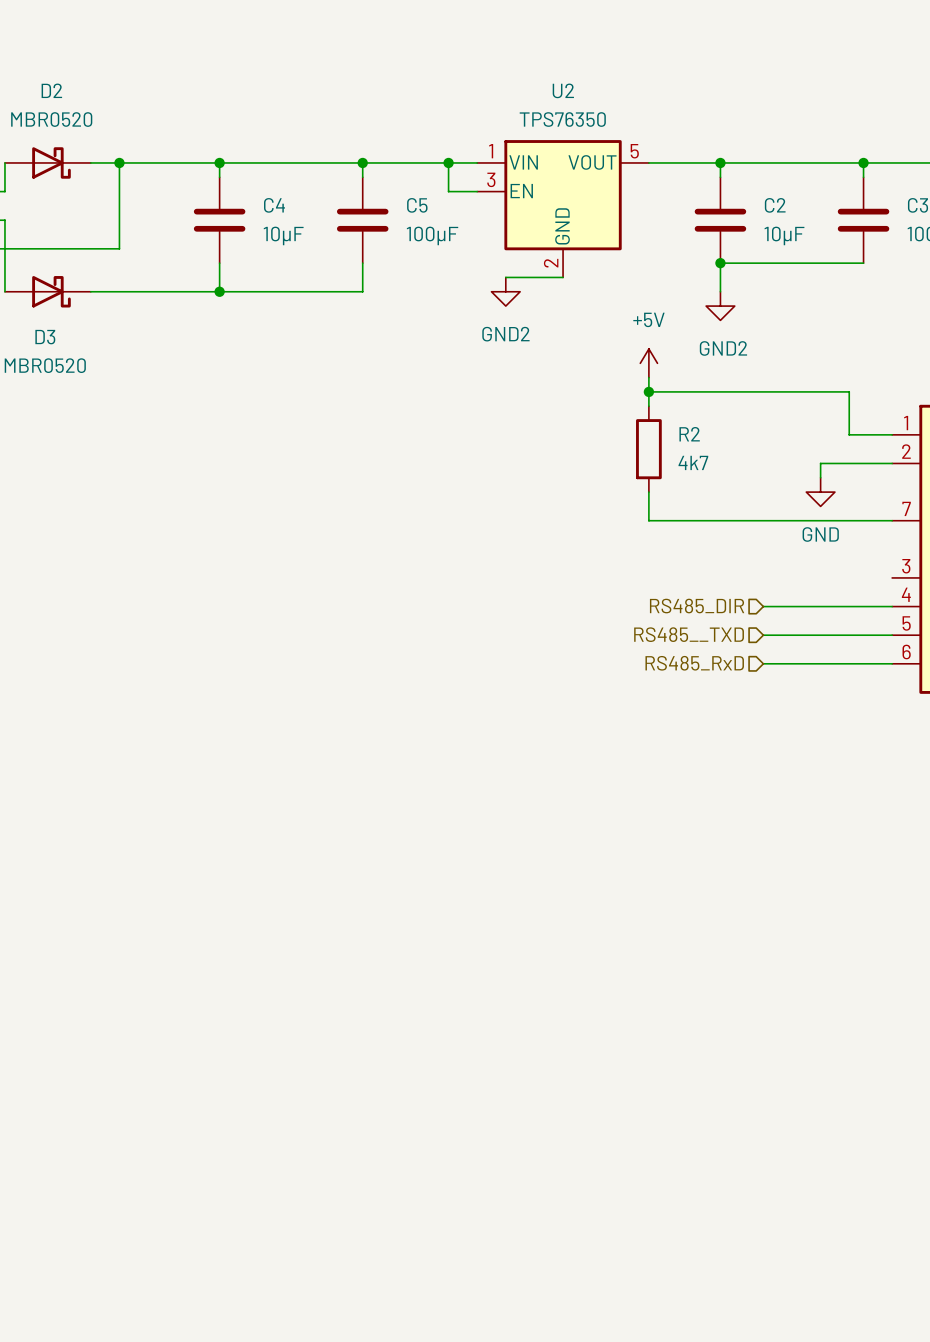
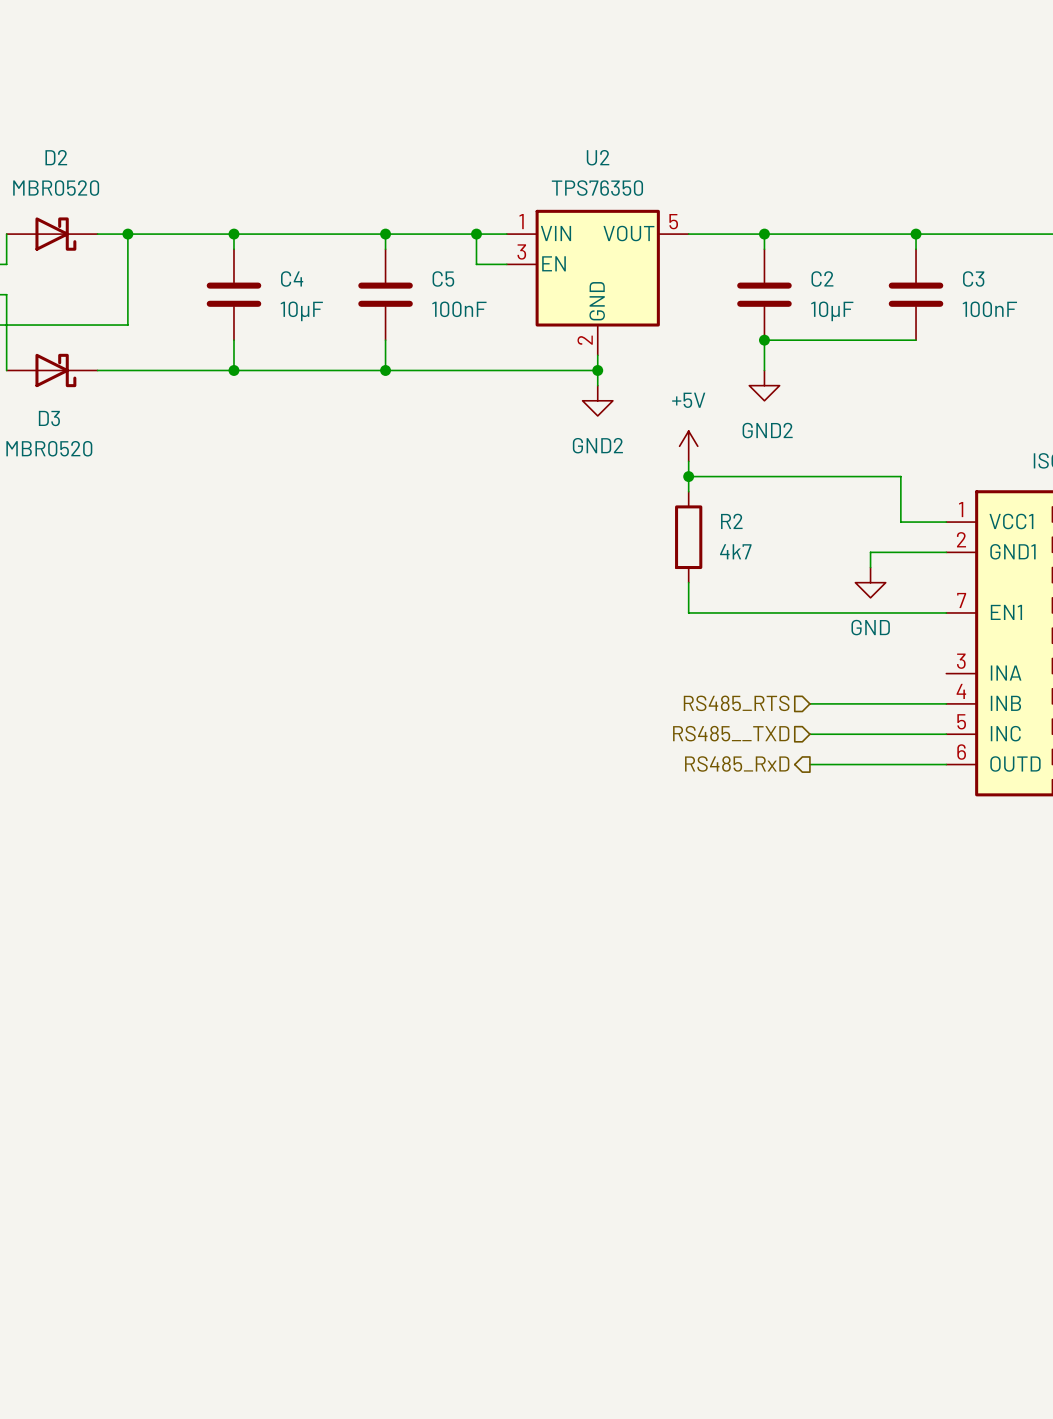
C5 value: 100µF (432, 235) -> 100nF (459, 309)
wire: (505, 277) (563, 277) -> (597, 385) (597, 355)
wire: none -> (385, 370) (597, 370)
junction: none -> (385, 370)
power symbol position: GND2 (505, 291) -> GND2 (597, 400)
junction: none -> (597, 370)
hierarchical label: RS485_DIR (697, 606) -> RS485_RTS (736, 703)
hierarchical label shape: input (694, 663) -> output (737, 763)

